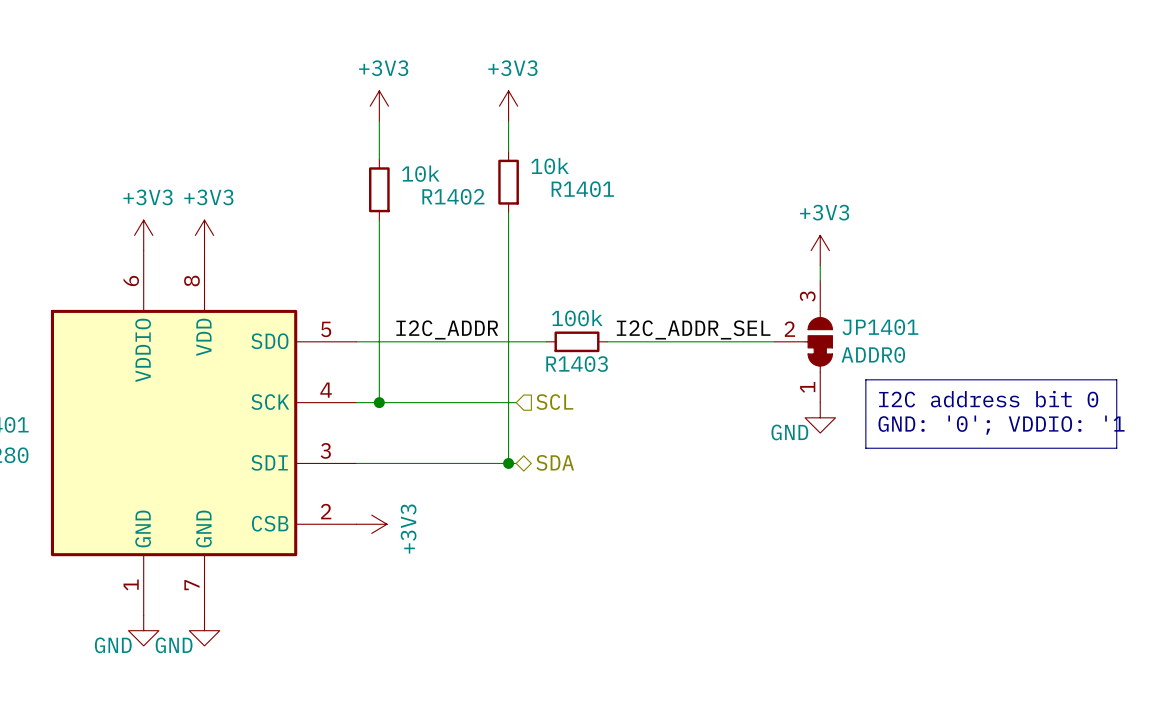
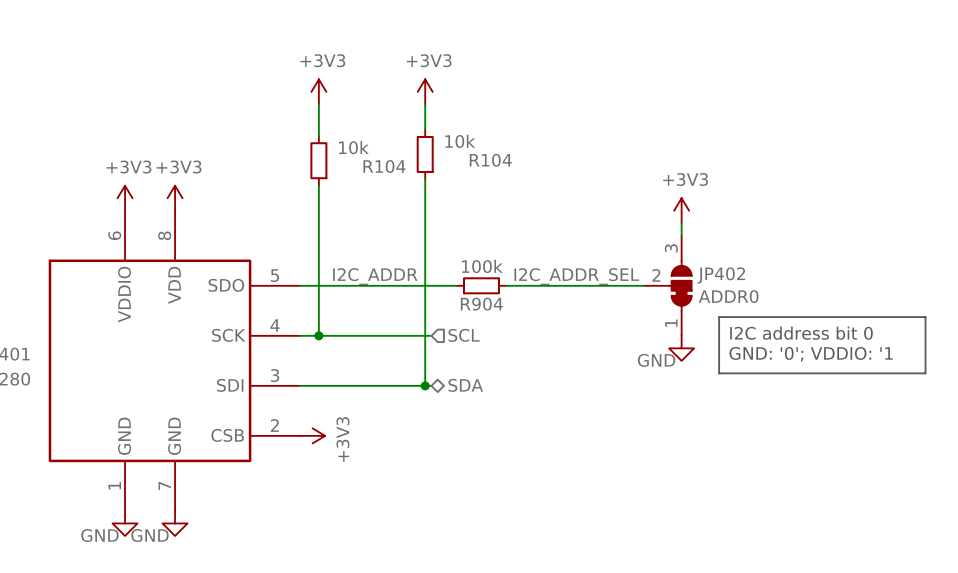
R1401 name: R1401 (582, 189) -> R104 (490, 160)
R1402 name: R1402 (453, 196) -> R104 (384, 166)
JP1401 name: JP1401 (880, 327) -> JP402 (721, 275)
R1403 name: R1403 (577, 364) -> R904 (481, 304)

